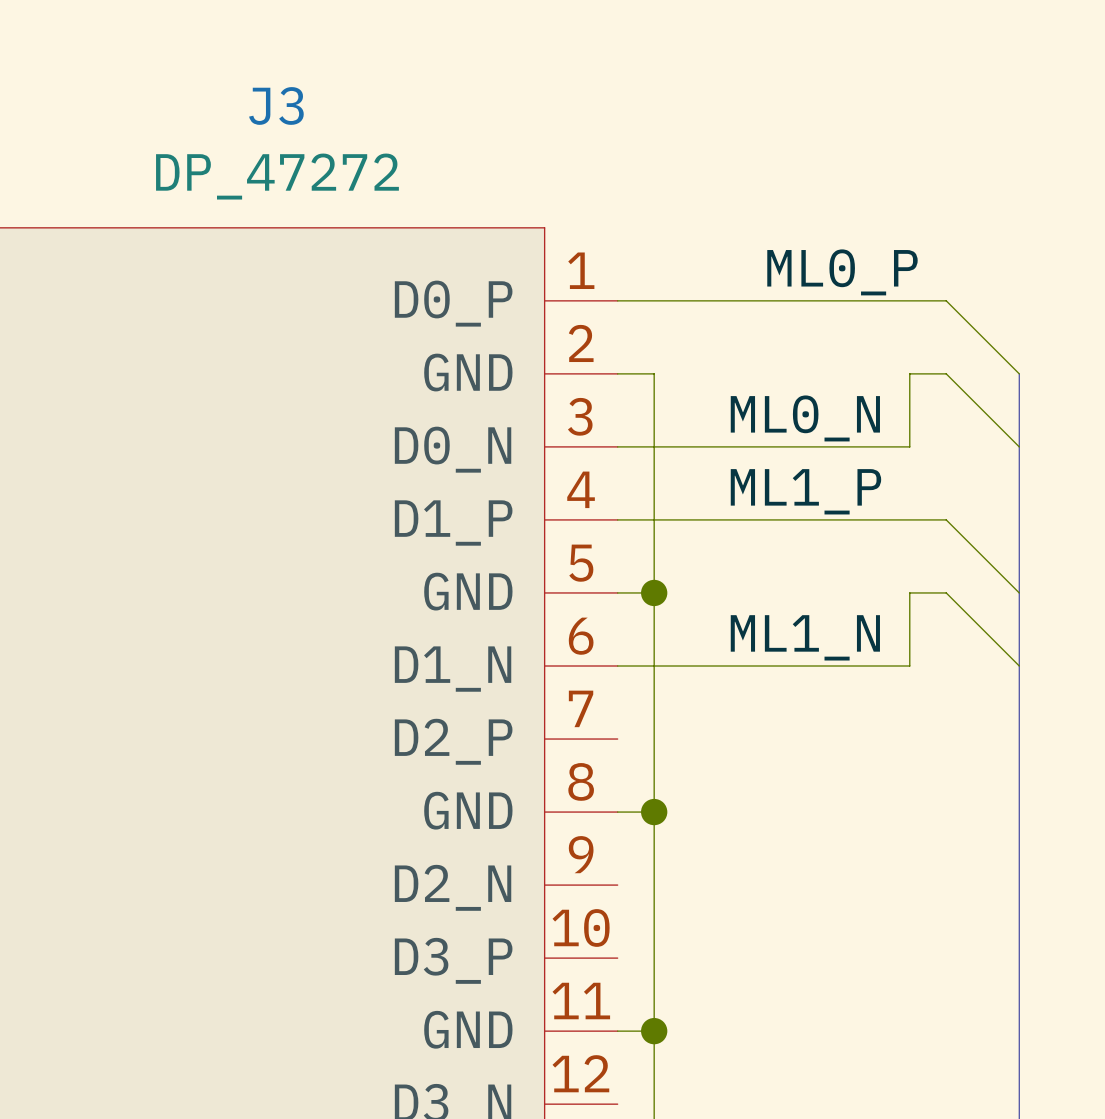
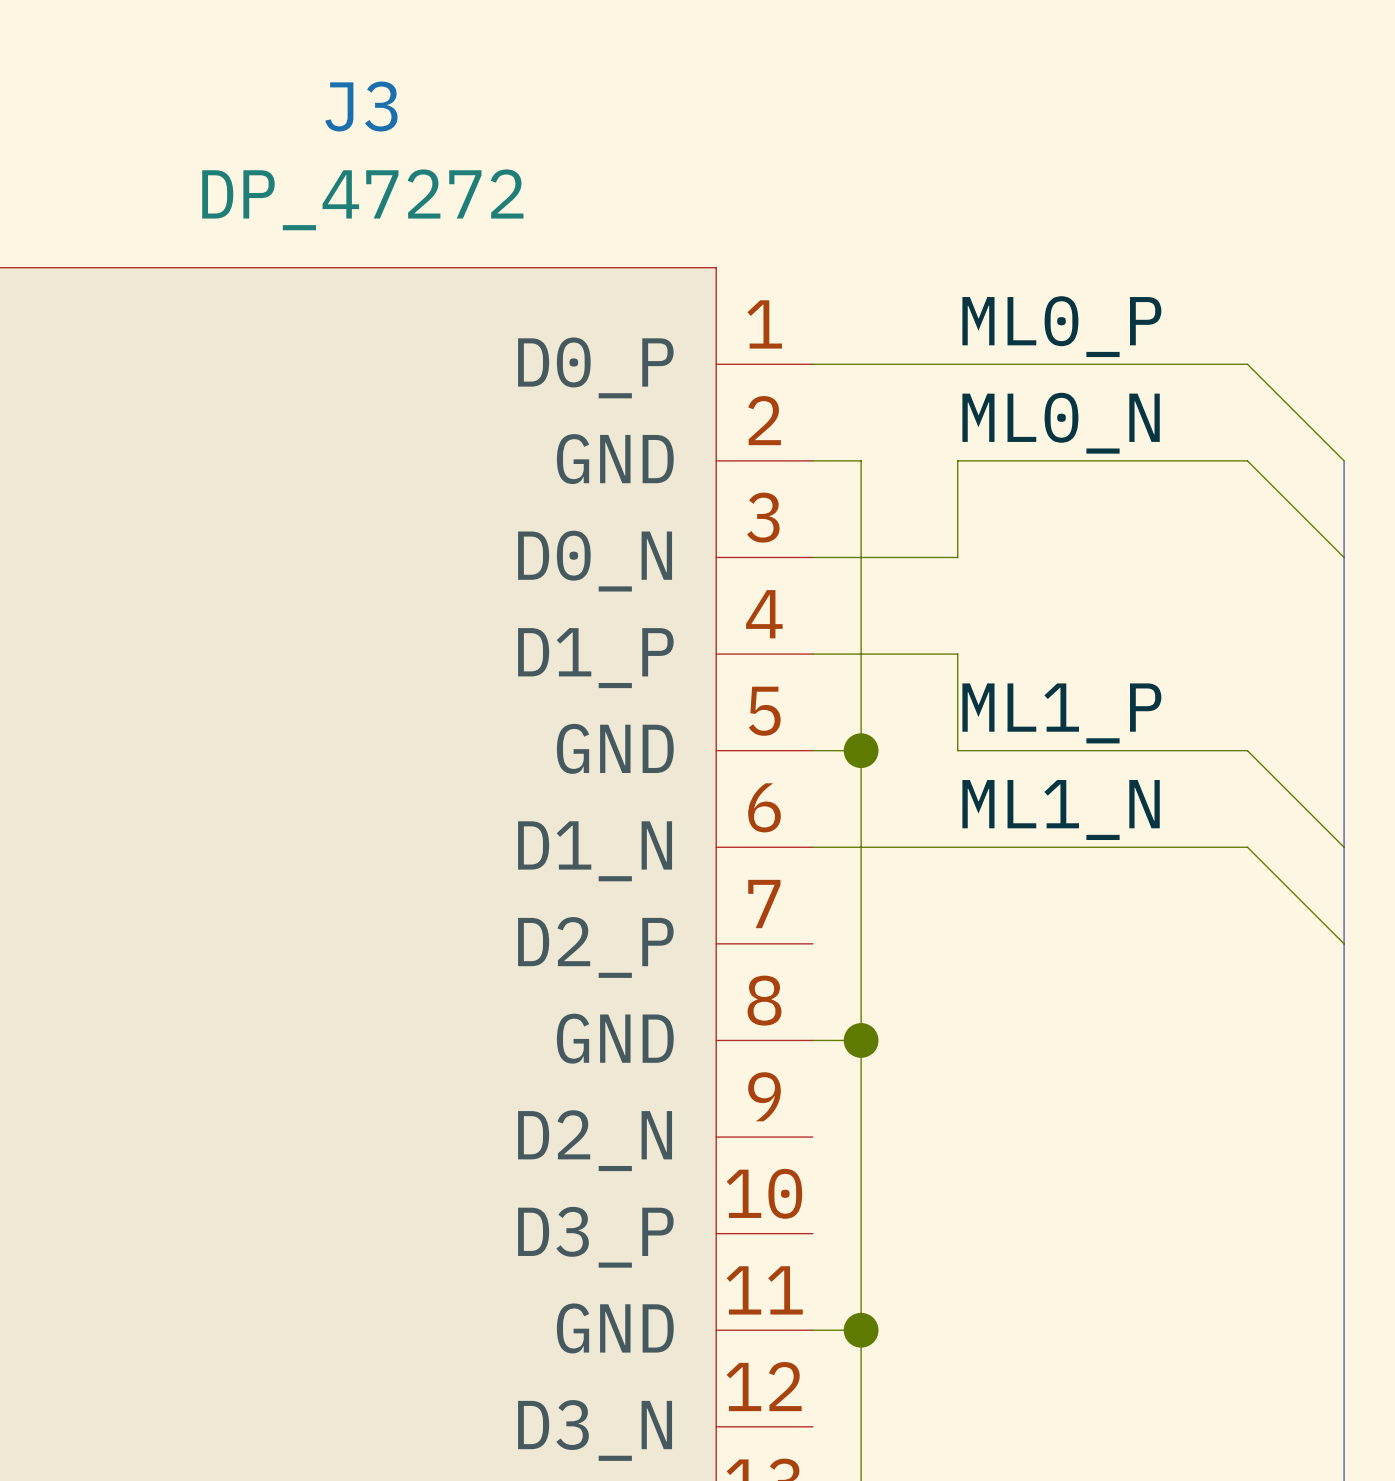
label position: ML0_P (842, 272) -> ML0_P (1061, 326)
wire: (909, 373) (909, 446) (727, 446) -> (1199, 460) (957, 460) (957, 557)
label position: ML0_N (805, 418) -> ML0_N (1061, 423)
label position: ML1_P (805, 491) -> ML1_P (1061, 713)
wire: (727, 519) (946, 519) (1019, 592) -> (957, 654) (957, 750) (1199, 750)
wire: (909, 592) (909, 666) -> (1344, 943) (1247, 847) (1199, 847)

